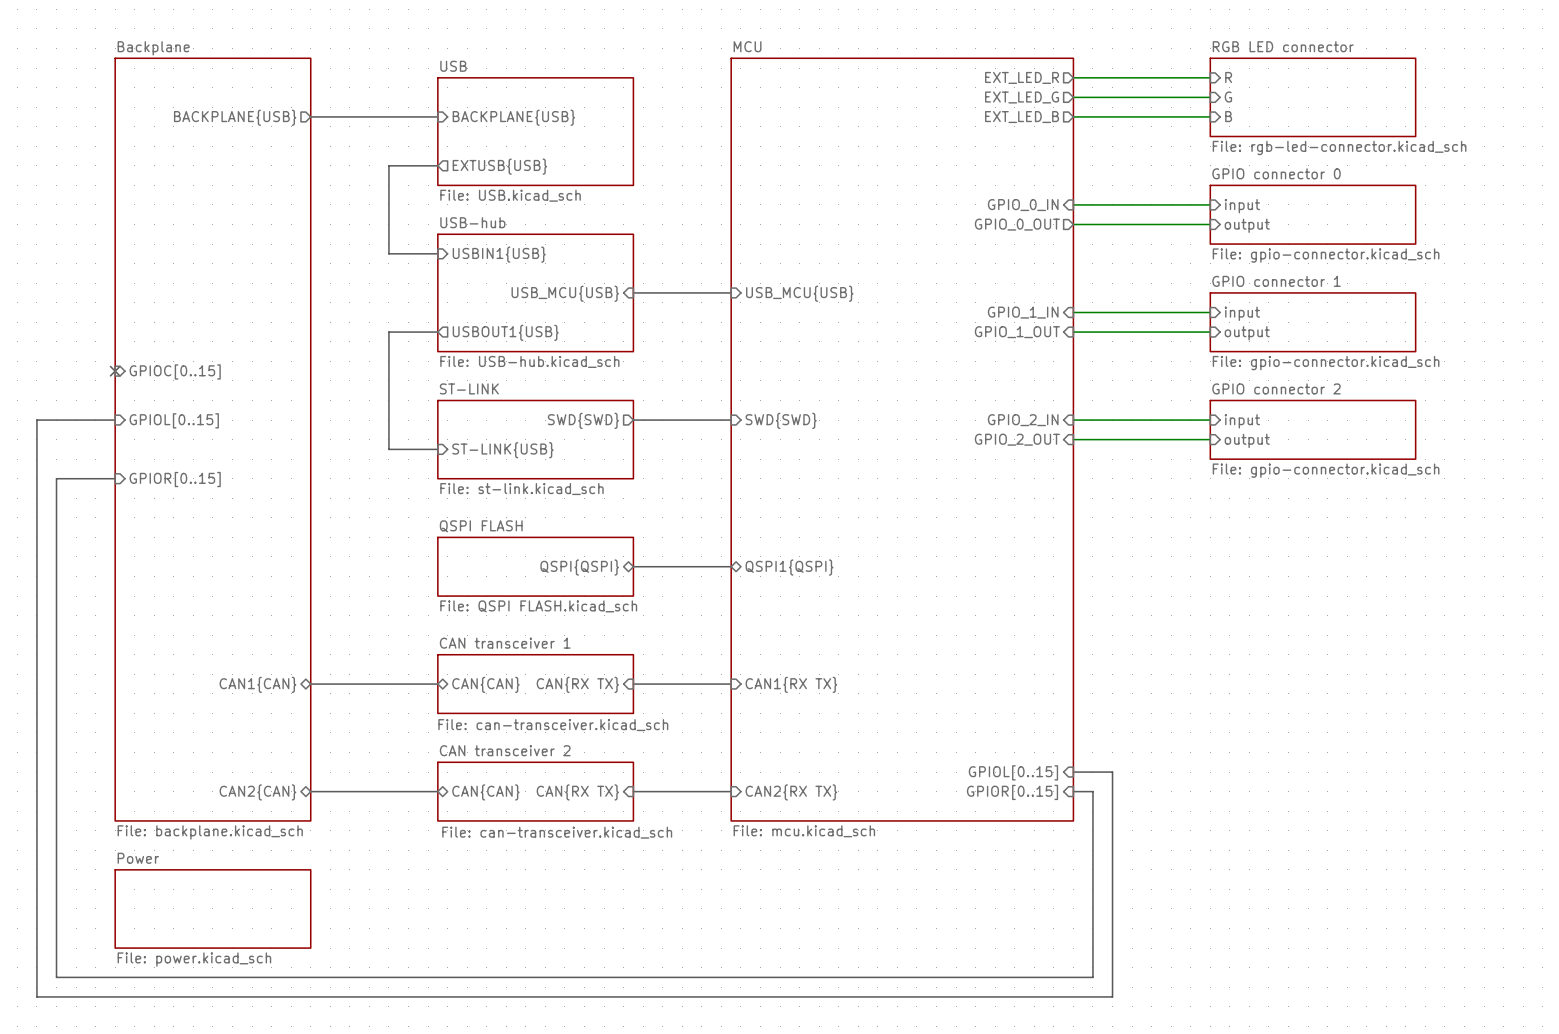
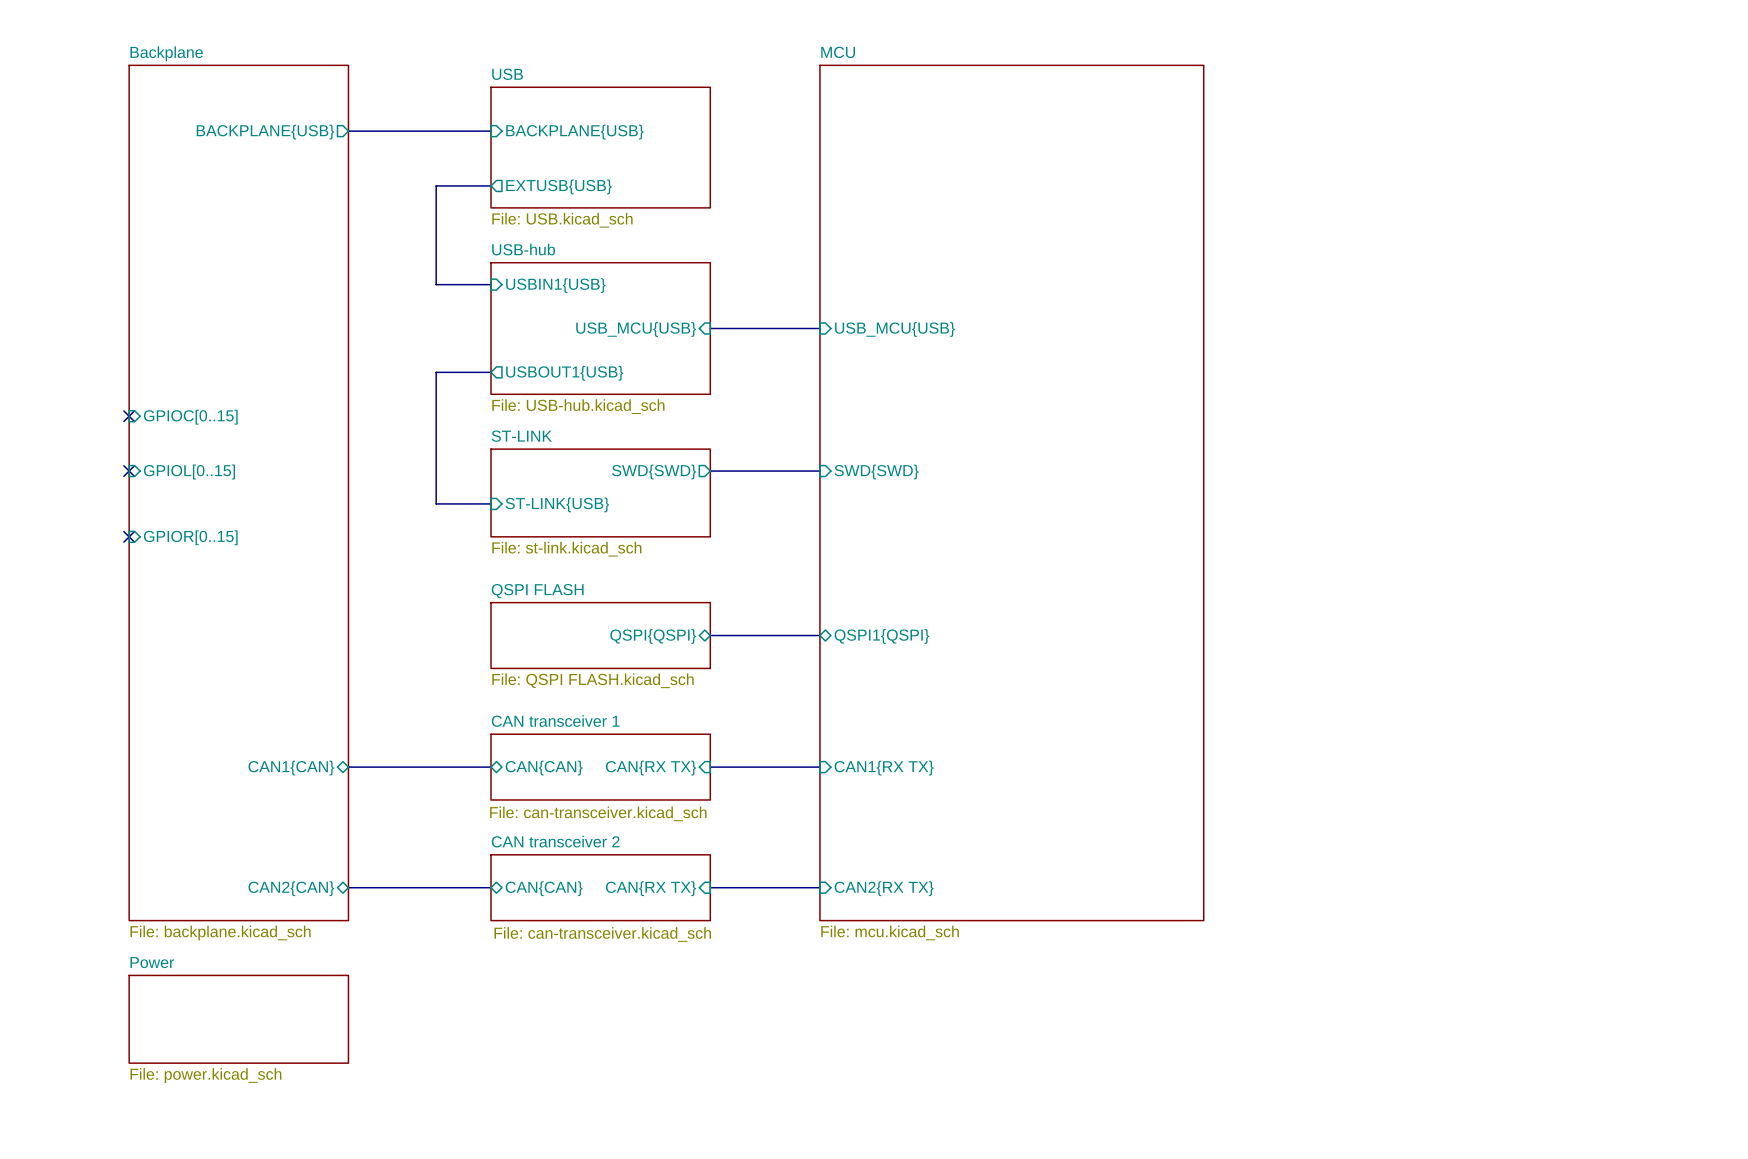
sheet pin: EXT_LED_R (1022, 77) -> none
wire: (1073, 77) (1210, 77) -> none
sheet pin: R (1228, 77) -> none
sheet pin: EXT_LED_G (1022, 97) -> none
wire: (1073, 97) (1210, 97) -> none
sheet pin: G (1228, 97) -> none
sheet RGB LED connector: File: rgb-led-connector.kicad_sch (1312, 97) -> none
wire: (1073, 116) (1210, 116) -> none
sheet pin: B (1228, 116) -> none
sheet pin: EXT_LED_B (1022, 117) -> none
wire: (1073, 204) (1210, 204) -> none
sheet pin: GPIO_0_IN (1023, 205) -> none
sheet pin: input (1242, 206) -> none
sheet GPIO connector 0: File: gpio-connector.kicad_sch (1312, 214) -> none
sheet pin: GPIO_0_OUT (1017, 224) -> none
wire: (1073, 224) (1210, 224) -> none
sheet pin: output (1247, 225) -> none
sheet pin: GPIO_1_IN (1023, 312) -> none
wire: (1073, 312) (1210, 312) -> none
sheet pin: input (1242, 313) -> none
sheet GPIO connector 1: File: gpio-connector.kicad_sch (1312, 322) -> none
sheet pin: GPIO_1_OUT (1017, 332) -> none
wire: (1073, 332) (1210, 332) -> none
sheet pin: output (1247, 333) -> none
bus: (115, 420) (36, 420) (36, 996) (1112, 996) (1112, 772) (1073, 772) -> none
no-connect mark: none -> (129, 471)
sheet pin: GPIO_2_IN (1023, 420) -> none
wire: (1073, 420) (1210, 420) -> none
sheet pin: input (1242, 421) -> none
sheet GPIO connector 2: File: gpio-connector.kicad_sch (1312, 429) -> none
sheet pin: GPIO_2_OUT (1017, 439) -> none
wire: (1073, 439) (1210, 439) -> none
sheet pin: output (1247, 440) -> none
bus: (115, 478) (56, 478) (56, 977) (1092, 977) (1092, 791) (1073, 791) -> none
no-connect mark: none -> (129, 536)
sheet pin: GPIOL[0..15] (1013, 772) -> none
sheet pin: GPIOR[0..15] (1012, 792) -> none

